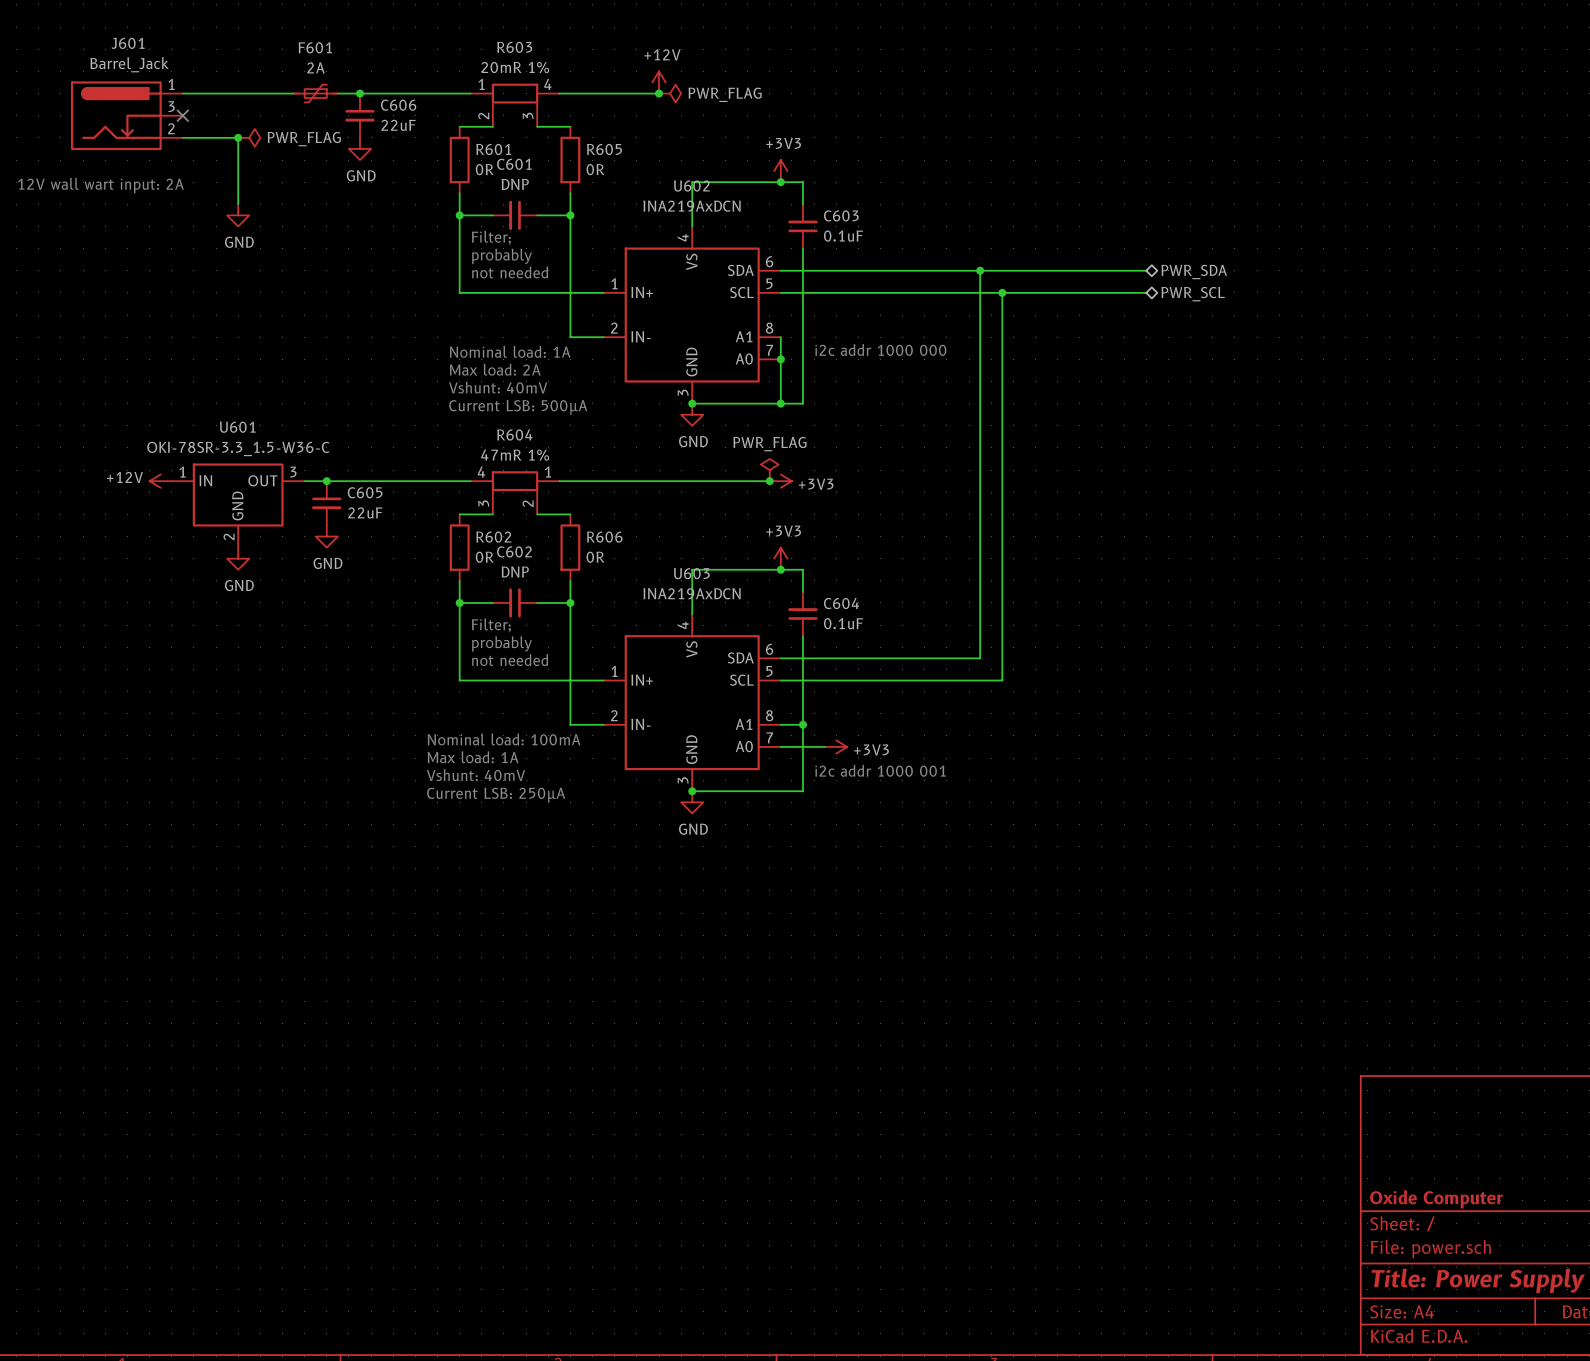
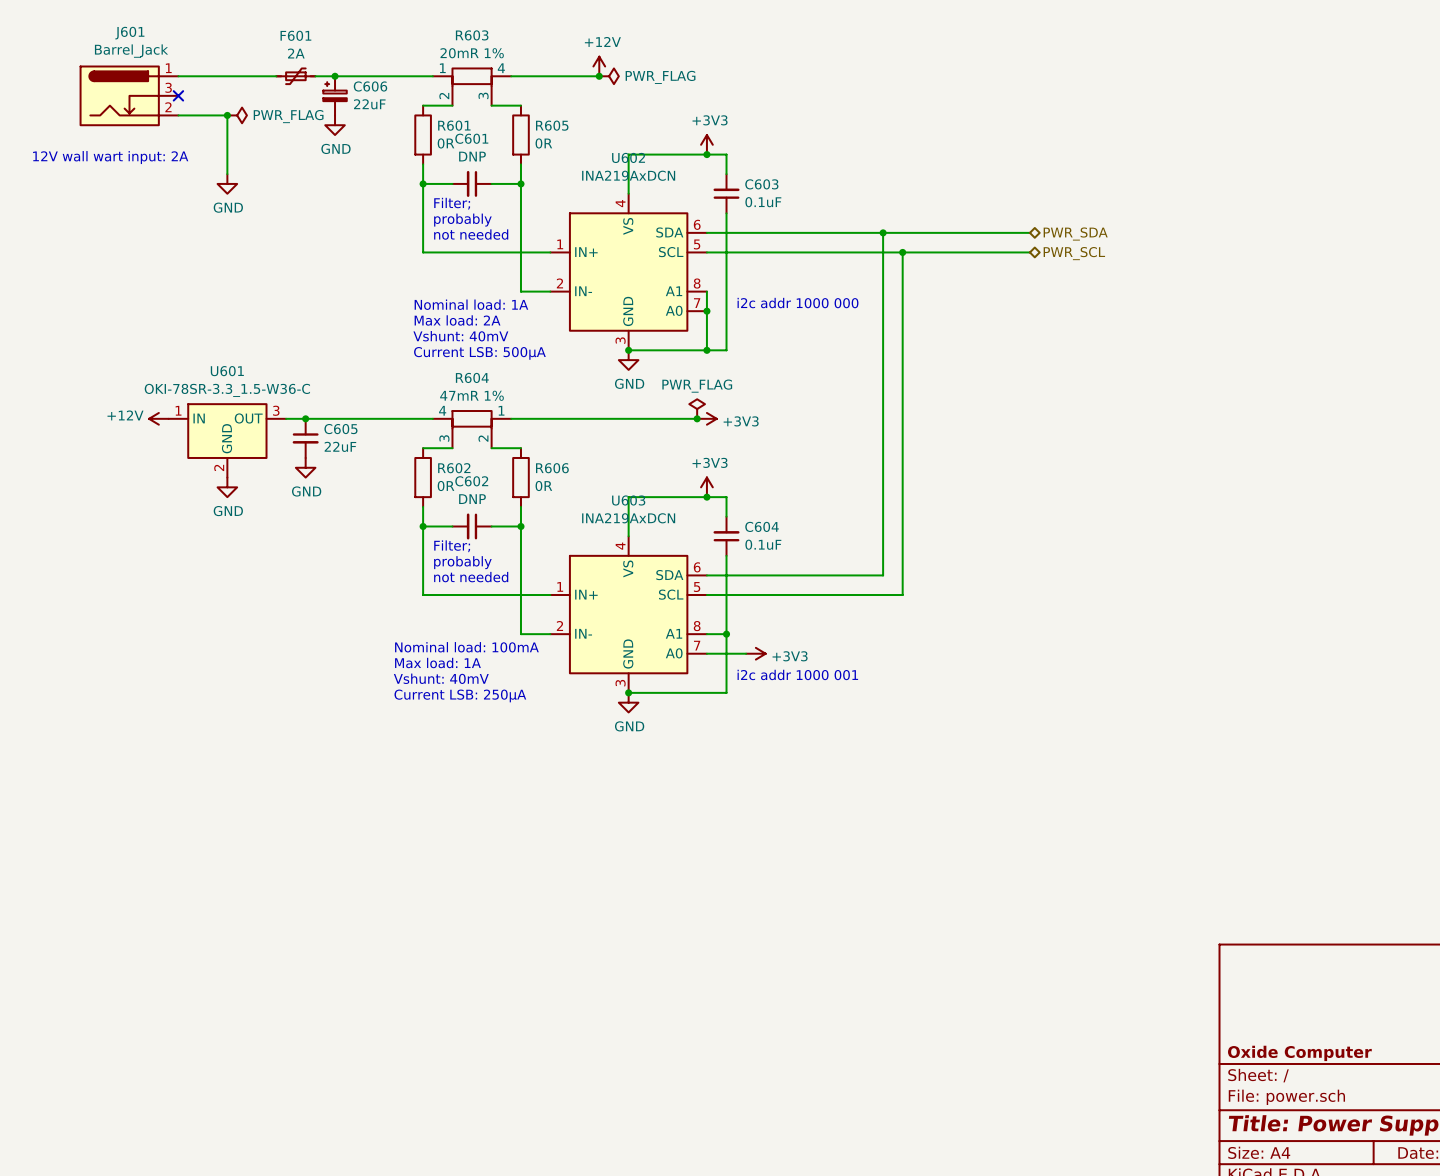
C606 symbol: [345, 93, 375, 138] -> [323, 76, 347, 116]

